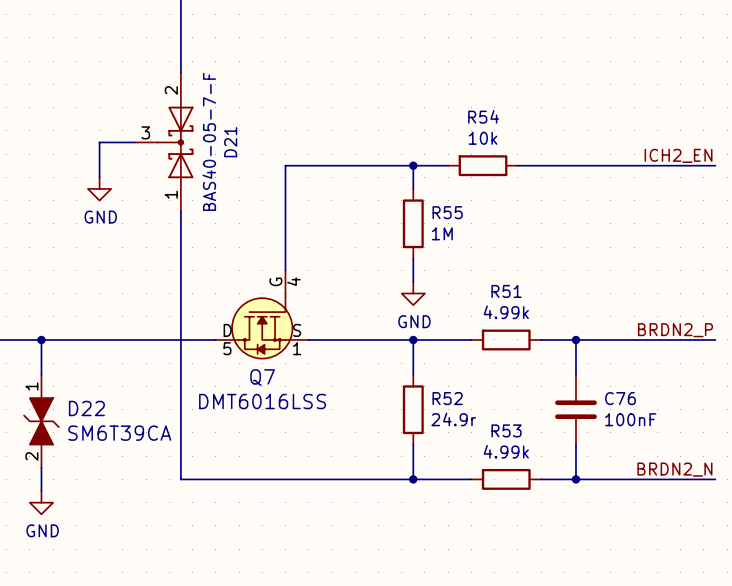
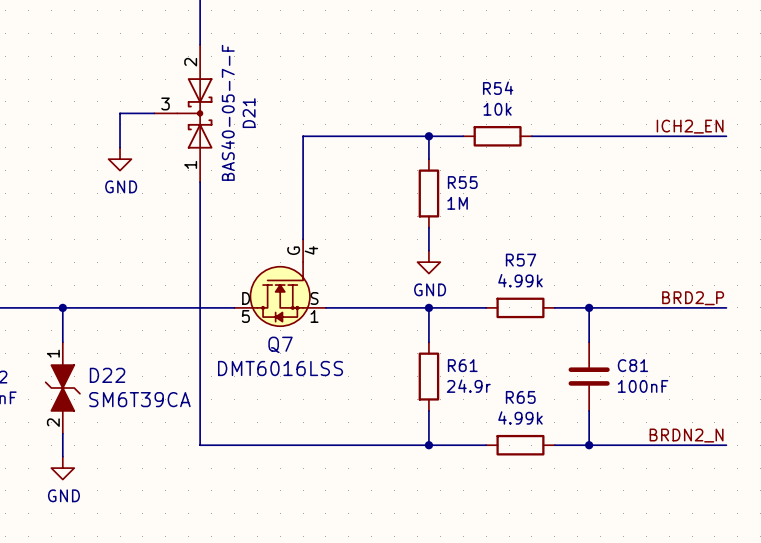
R51 name: R51 (506, 291) -> R57 (521, 260)
label: BRDN2_P (675, 330) -> BRD2_P (693, 298)
R52 name: R52 (447, 398) -> R61 (462, 365)
C76 name: C76 (620, 398) -> C81 (632, 365)
R53 name: R53 (506, 430) -> R65 (520, 397)

